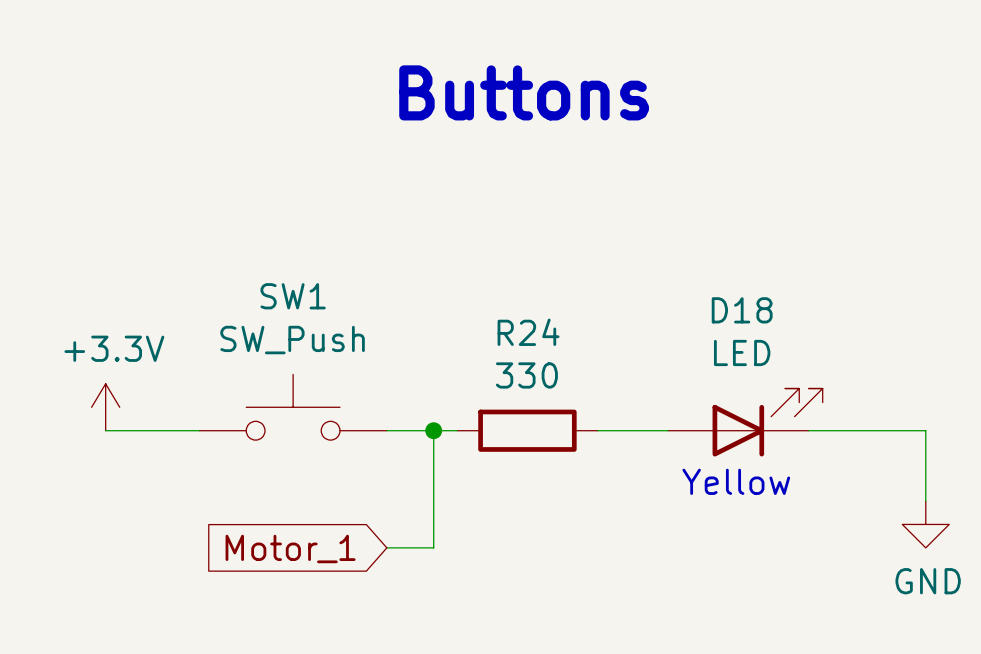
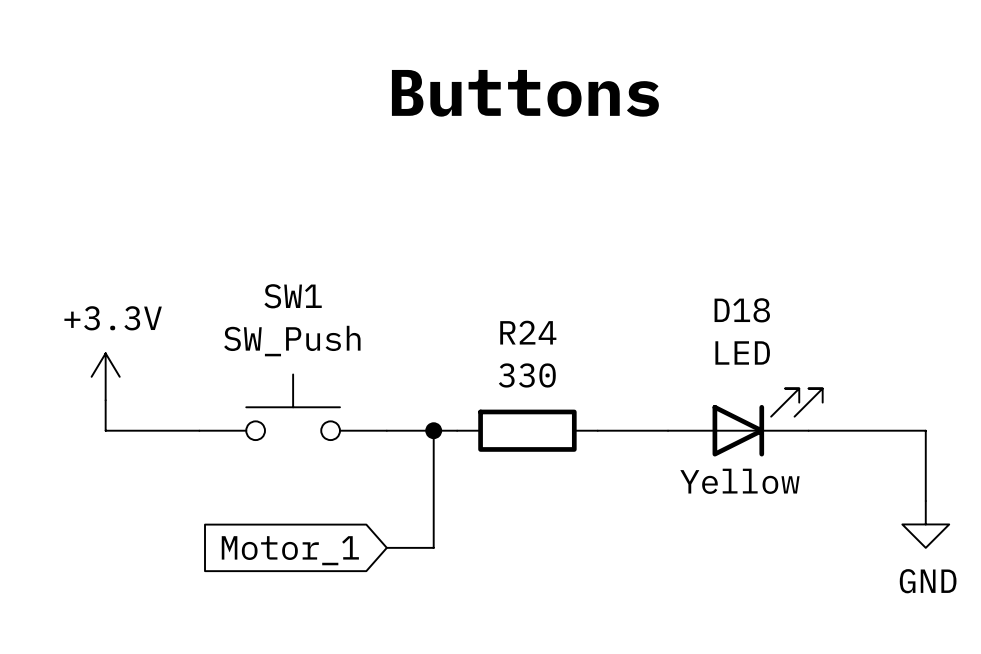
power symbol position: +3.3V (105, 407) -> +3.3V (105, 376)

